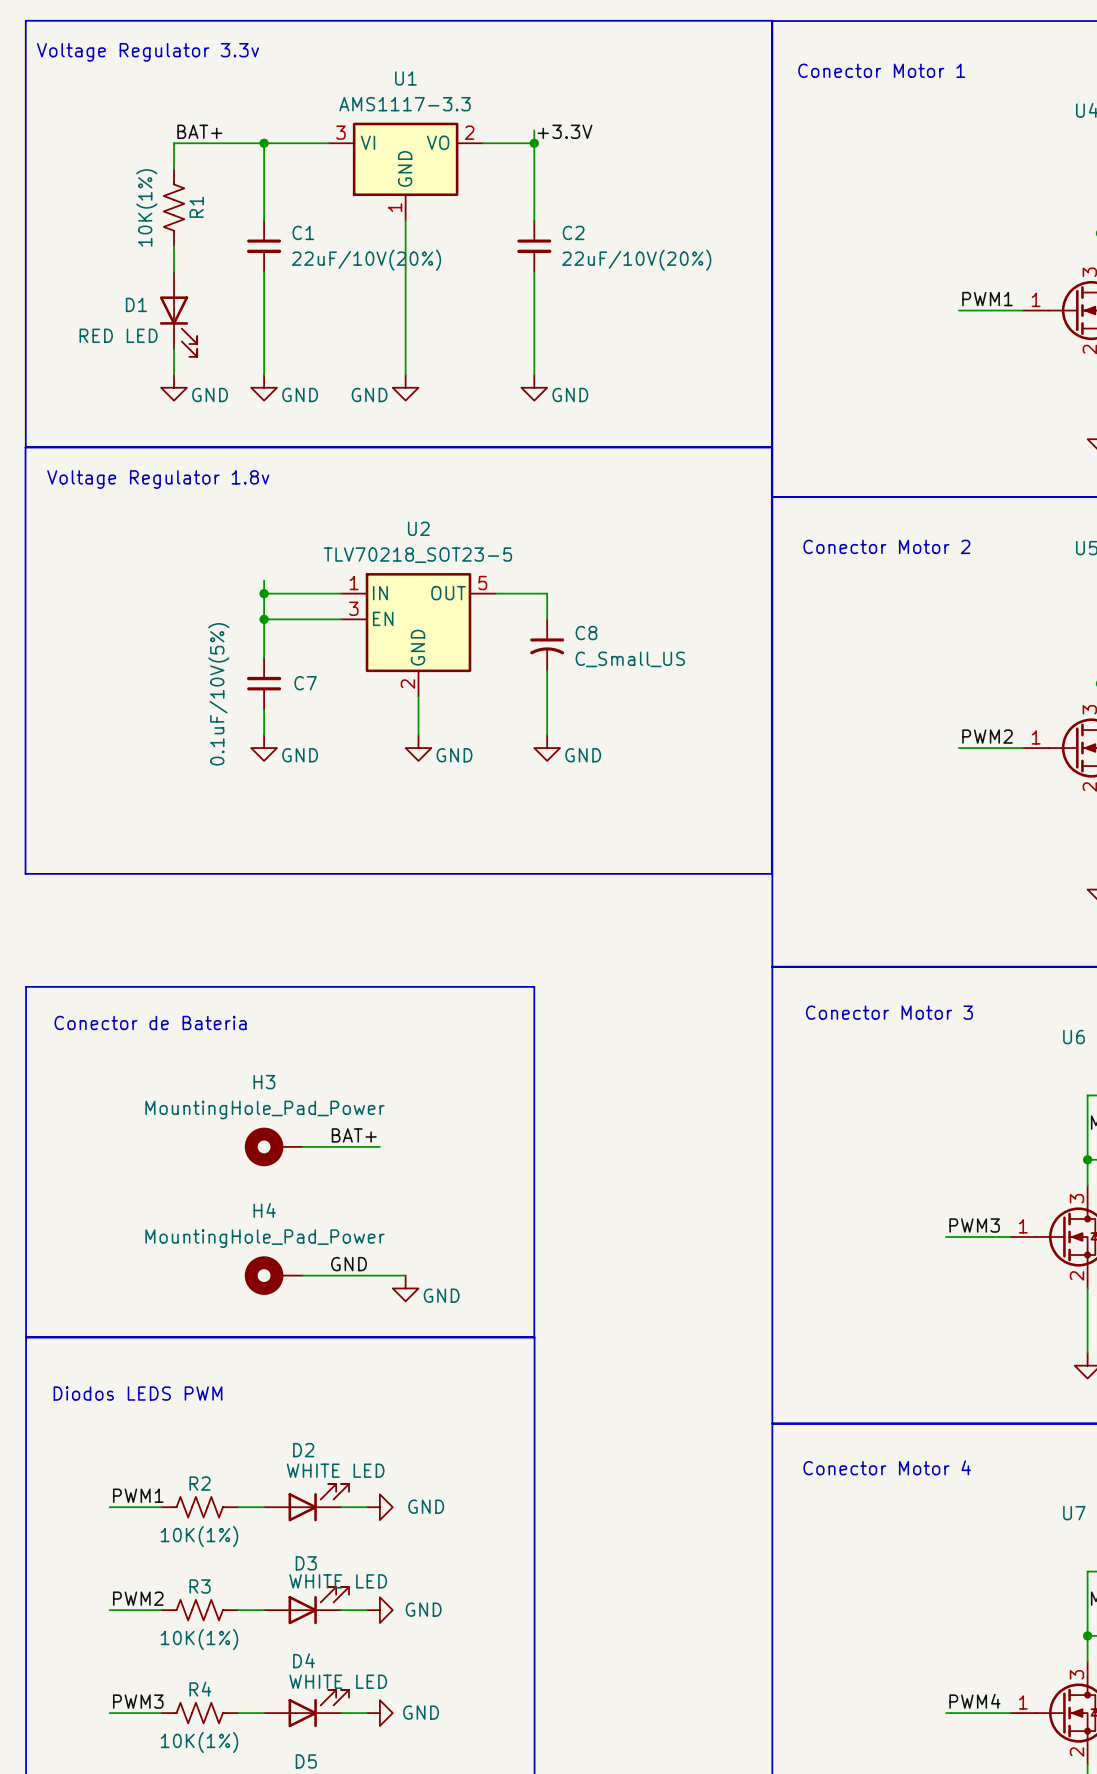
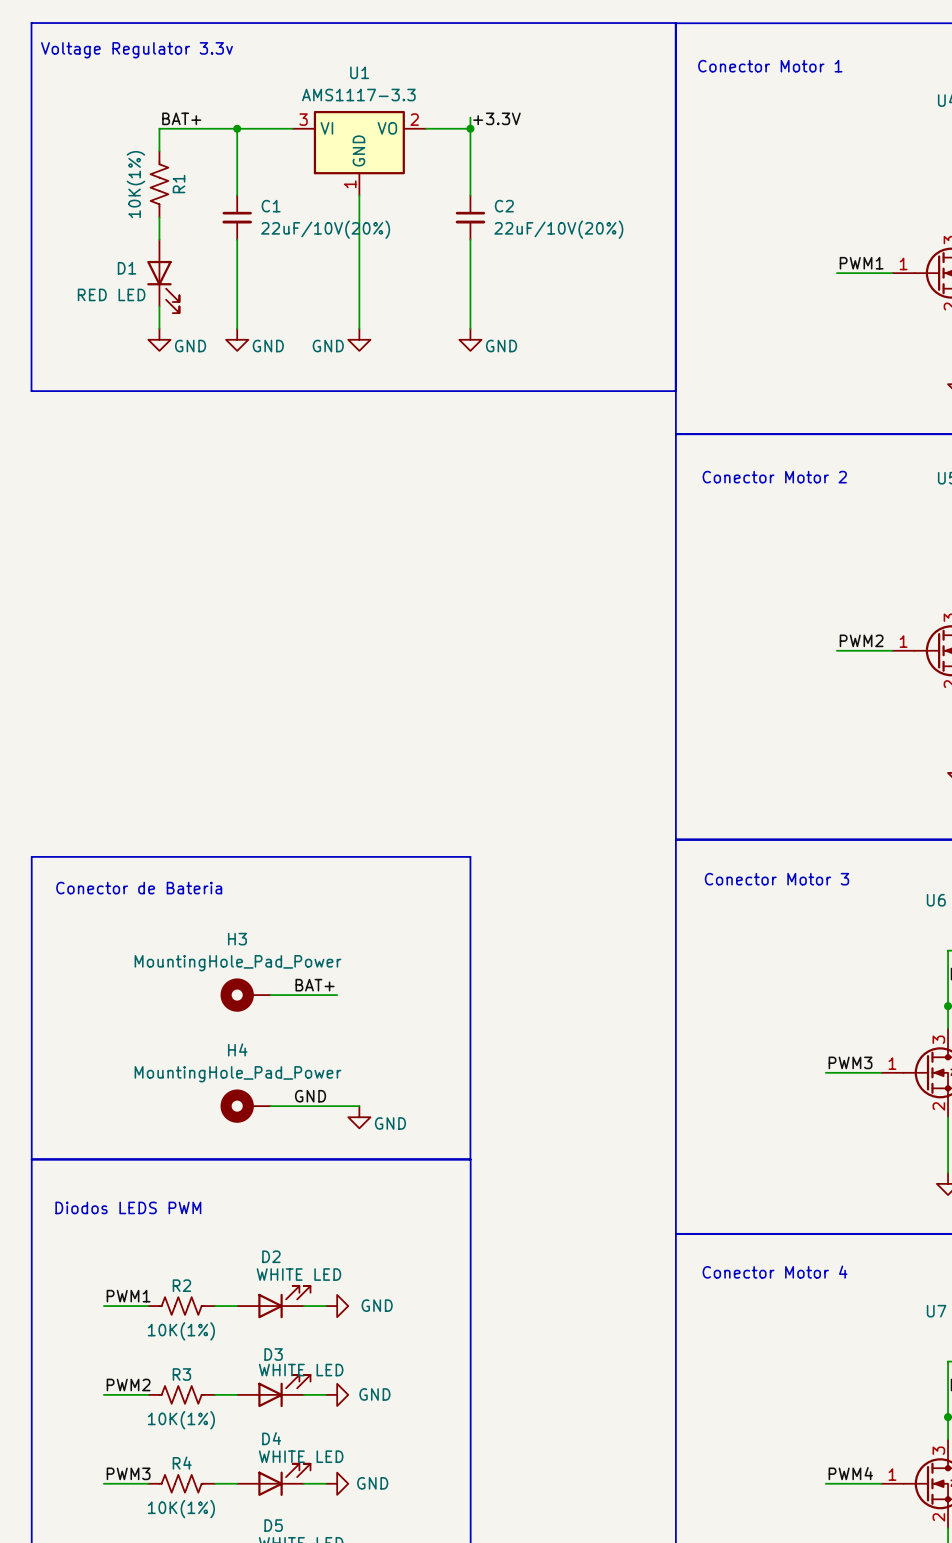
line: (25, 447) (771, 447) (771, 873) (25, 873) (25, 447) -> none
text: Voltage Regulator 1.8v (158, 479) -> none
wire: (264, 580) (264, 657) -> none
wire: (264, 593) (341, 593) -> none
junction: (264, 593) -> none
wire: (495, 593) (547, 593) (547, 619) -> none
wire: (264, 619) (341, 619) -> none
junction: (264, 619) -> none
U2: TLV70218_SOT23-5 (418, 634) -> none
C8: C_Small_US (547, 645) -> none
wire: (547, 670) (547, 735) -> none
C7: 0.1uF/10V(5%) (264, 683) -> none
wire: (418, 696) (418, 735) -> none
wire: (264, 709) (264, 735) -> none
power symbol: GND (264, 748) -> none
power symbol: GND (418, 748) -> none
power symbol: GND (547, 748) -> none

